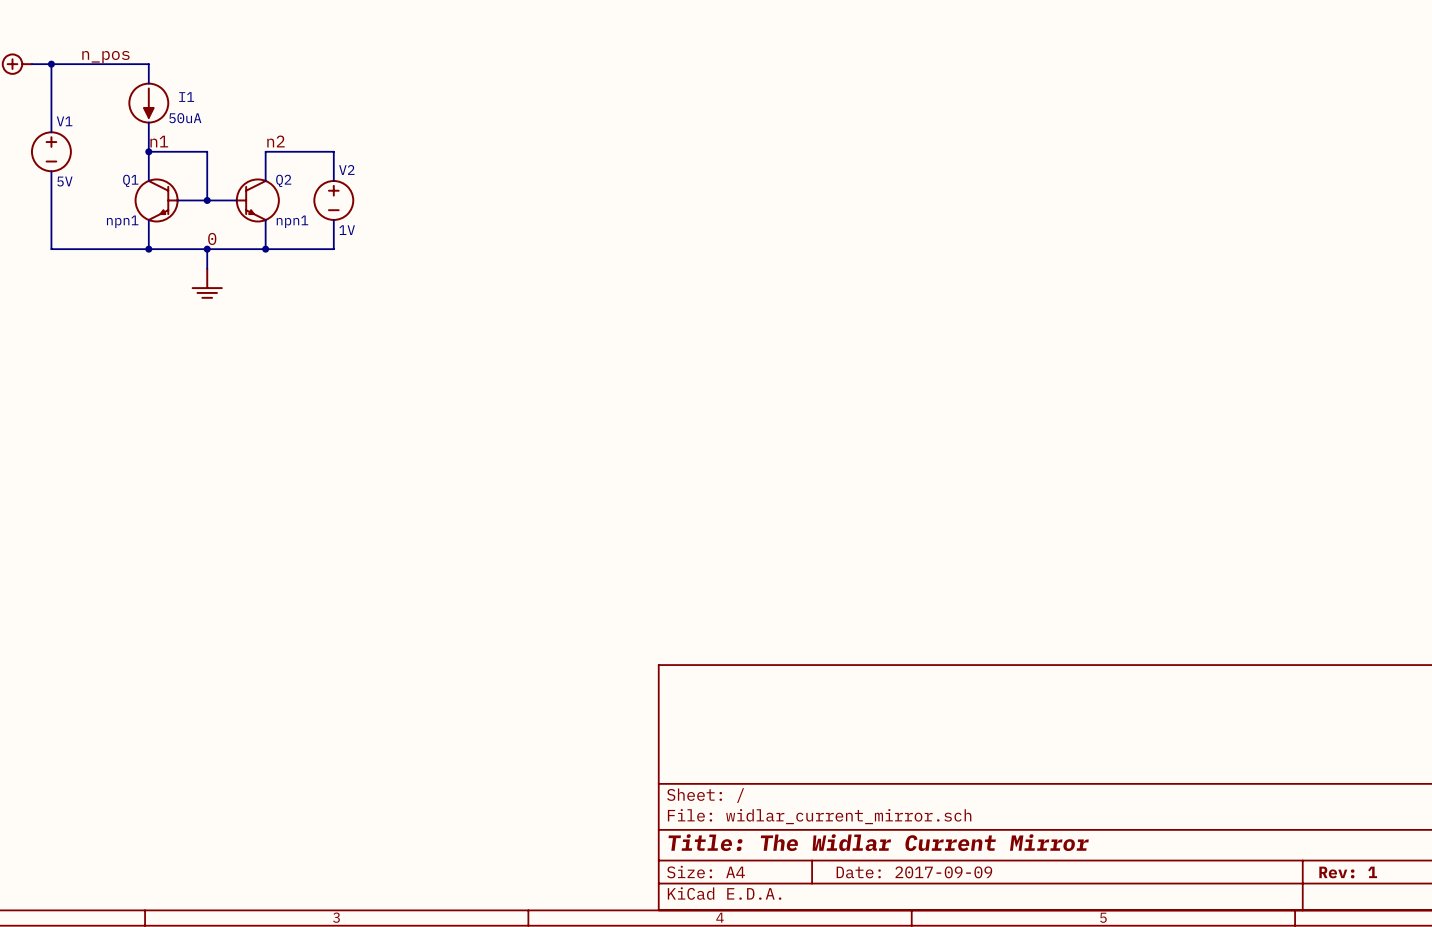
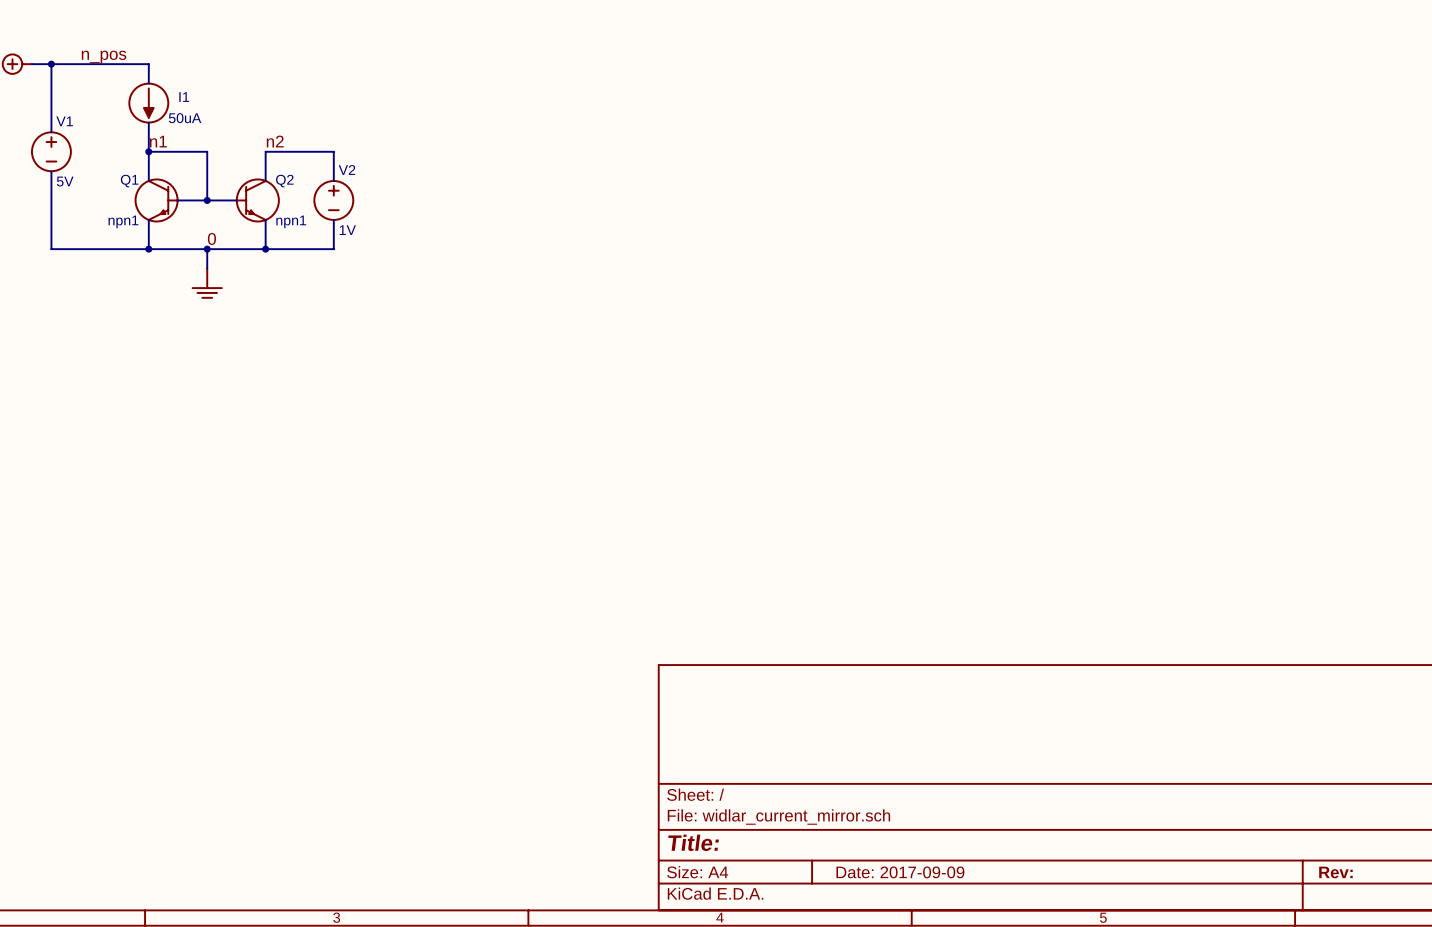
title block: Title: The Widlar Current Mirror (878, 842) -> Title: (693, 842)
title block: Rev: 1 (1348, 872) -> Rev: (1335, 872)

